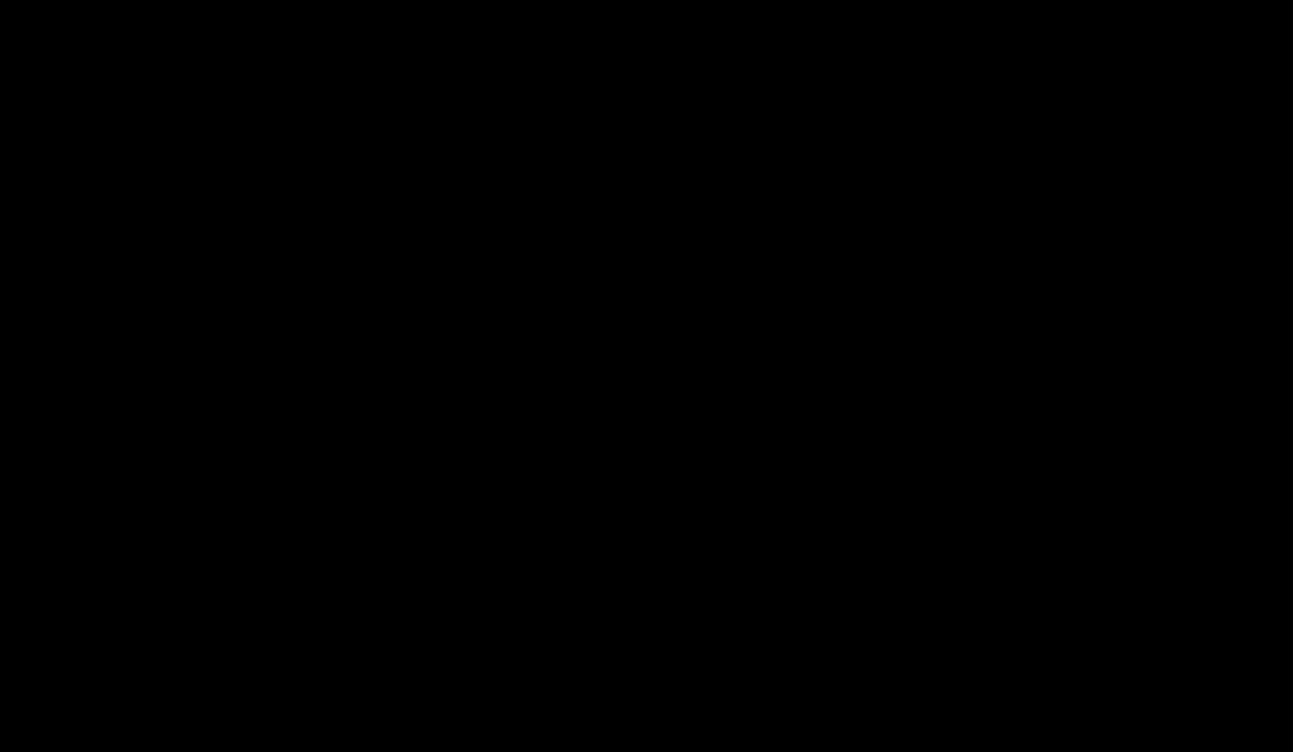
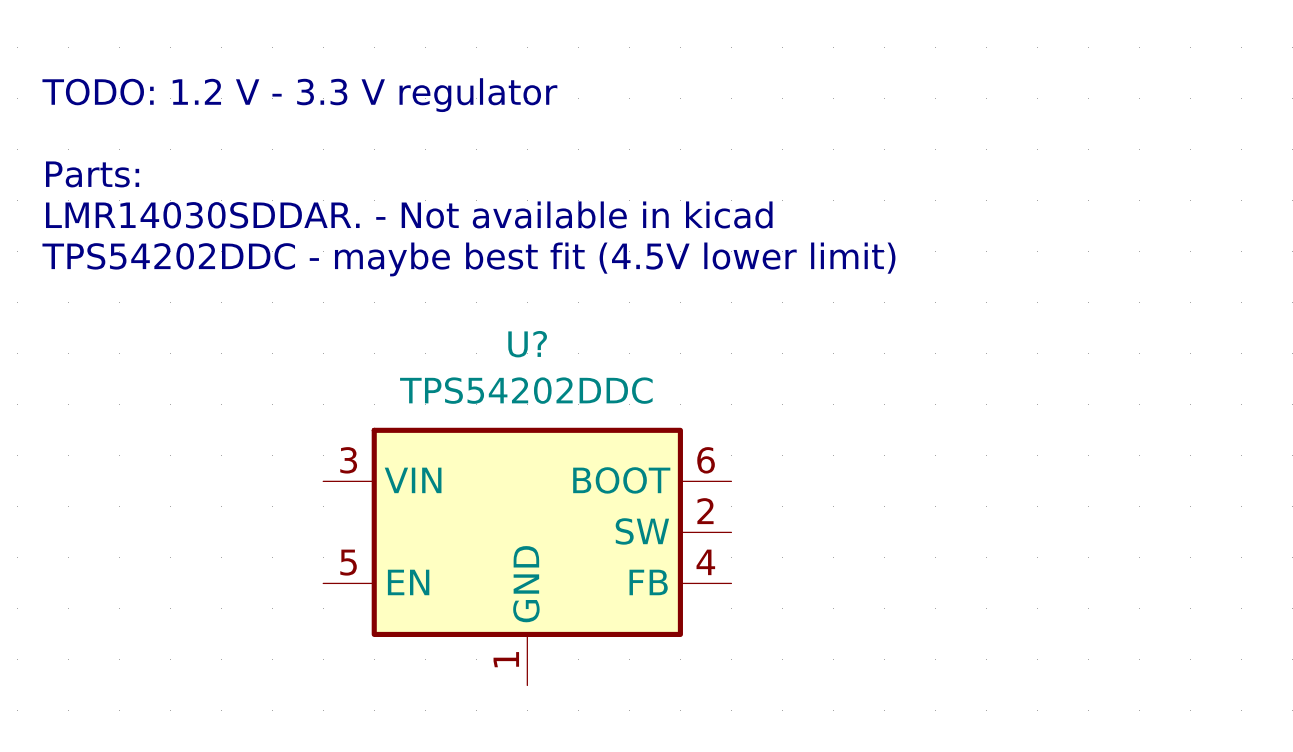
text: none -> TODO: 1.2 V - 3.3 V regulator (299, 95)
text: none -> Parts: (92, 174)
text: none -> LMR14030SDDAR. - Not available in kicad (409, 214)
text: none -> TPS54202DDC - maybe best fit (4.5V lower limit) (468, 259)
U?: none -> TPS54202DDC (527, 556)

